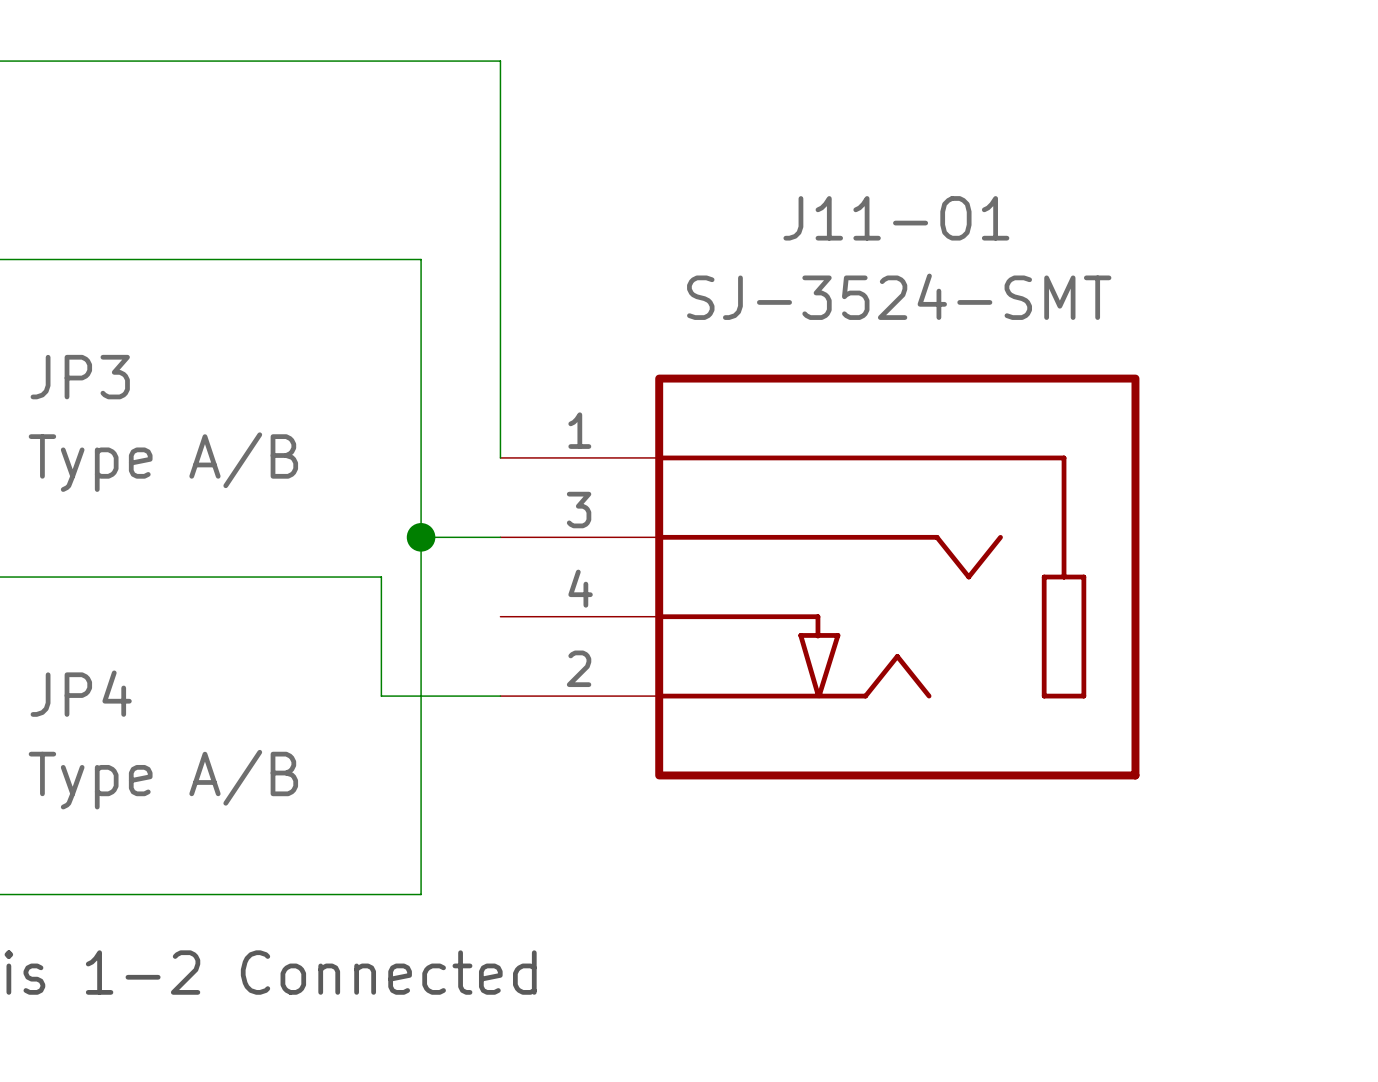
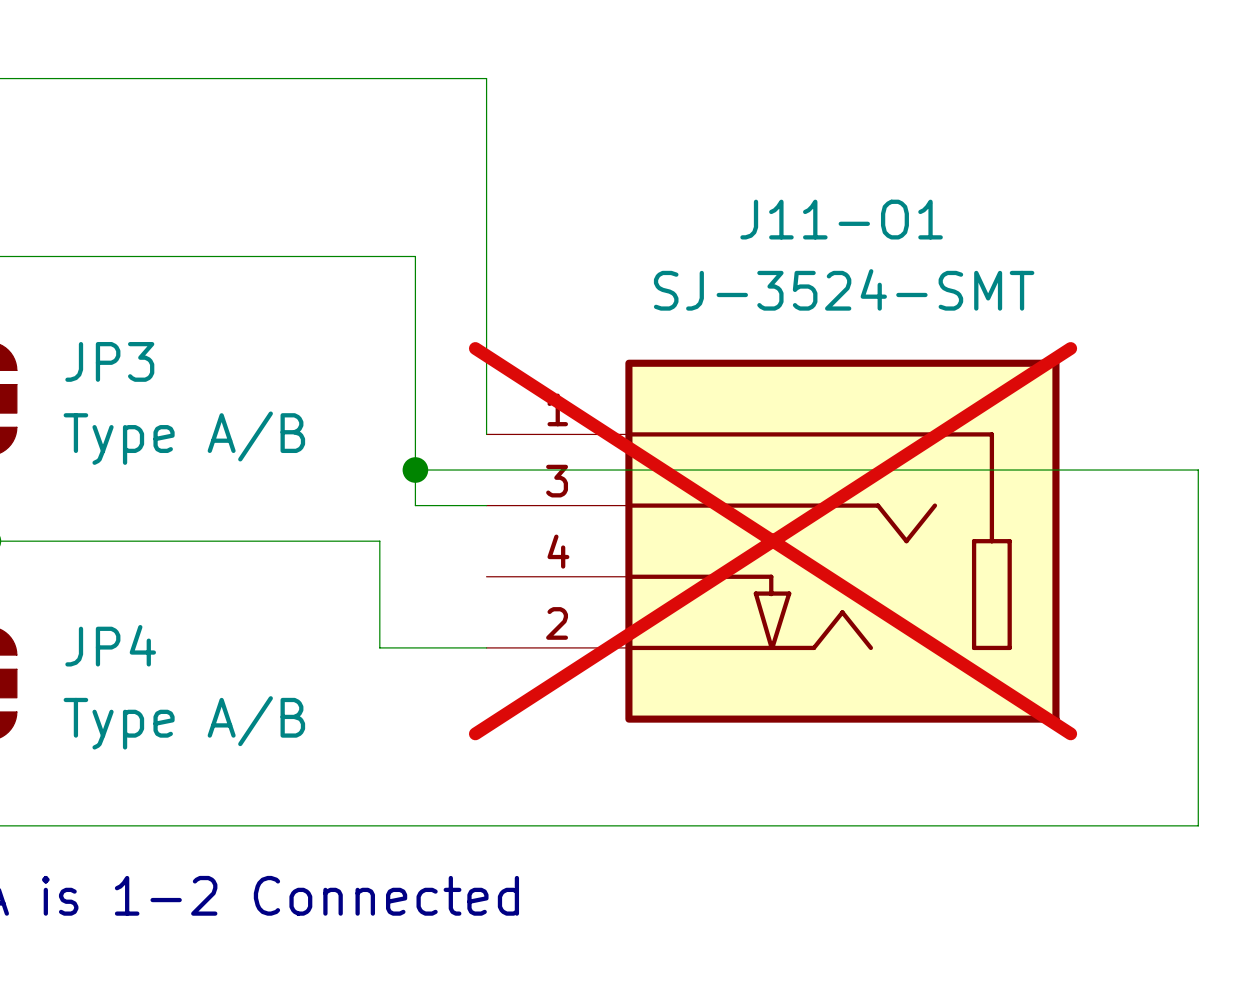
wire: (421, 537) (421, 894) -> (415, 470) (1198, 470) (1198, 825) (415, 825)
junction position: (421, 537) -> (415, 470)
J11-O1 do-not-place cross: none -> (773, 541)

